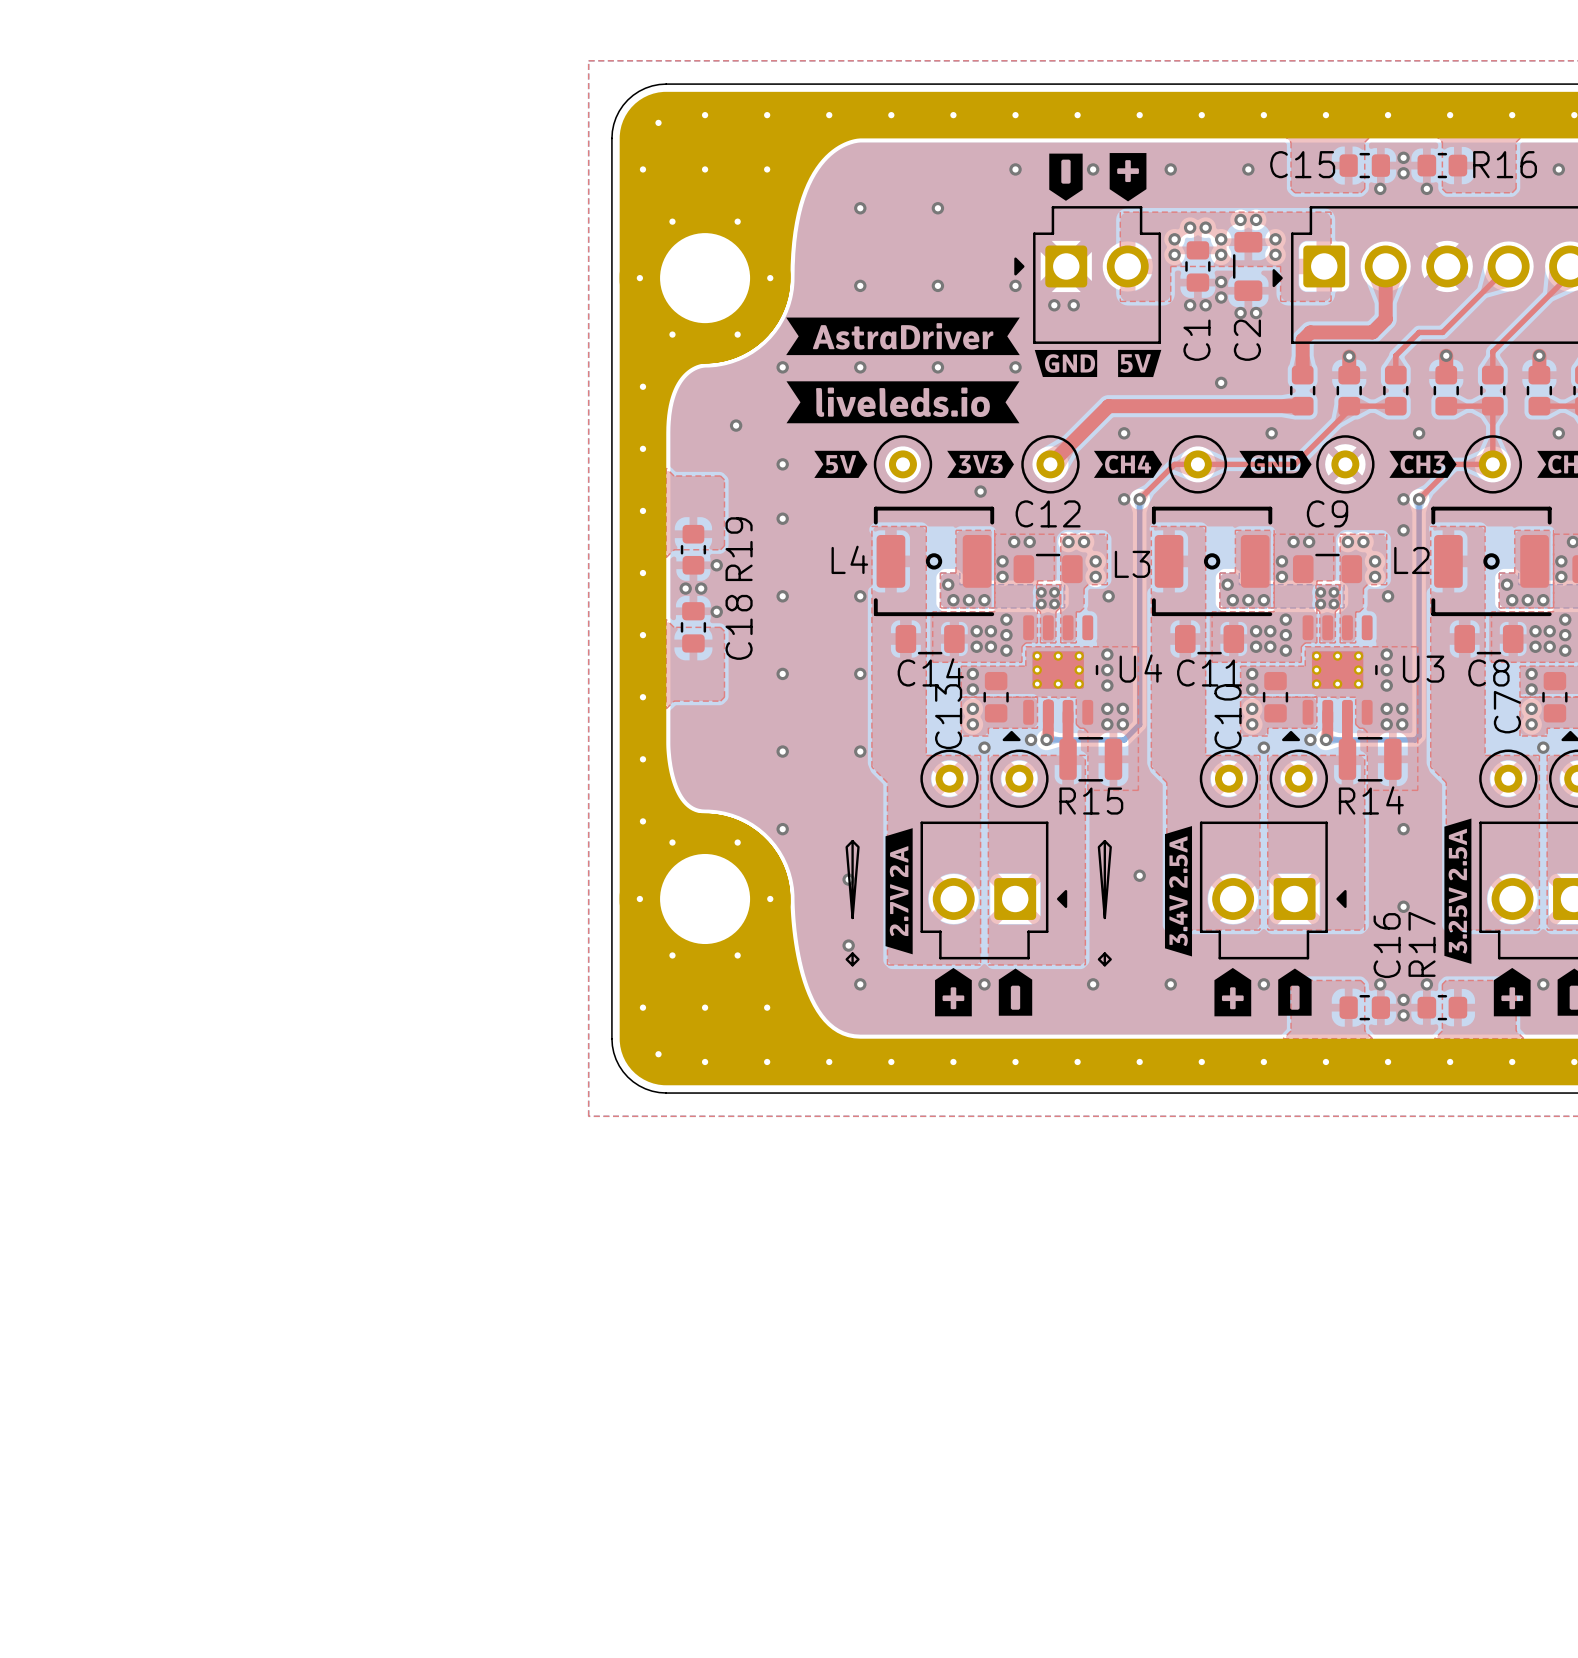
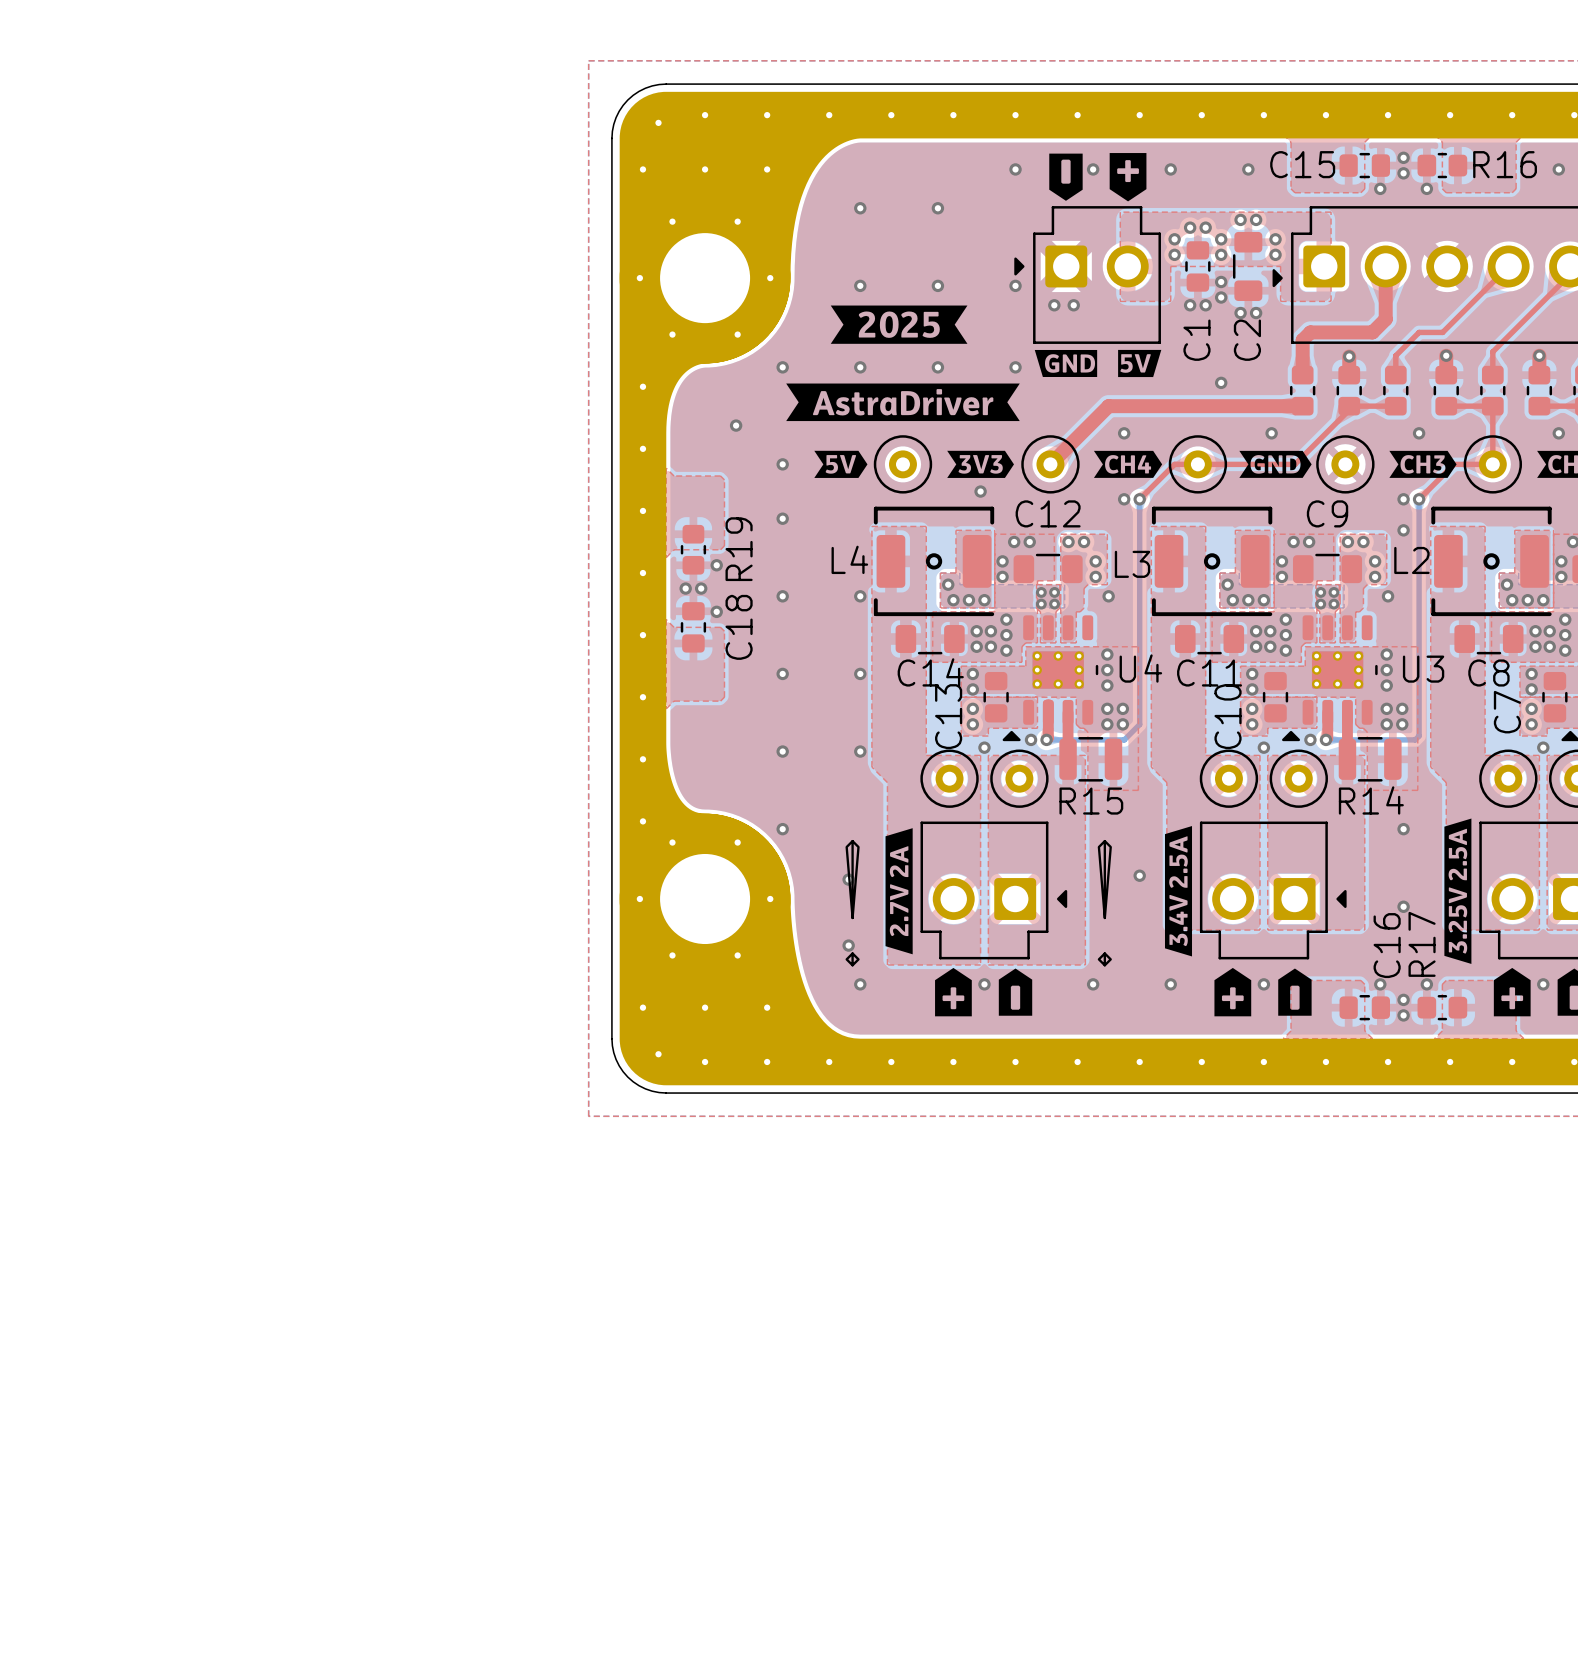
drawing: none -> [830, 305, 968, 344]
drawing position: (902, 336) -> (902, 402)
drawing: [786, 381, 1020, 424] -> none

